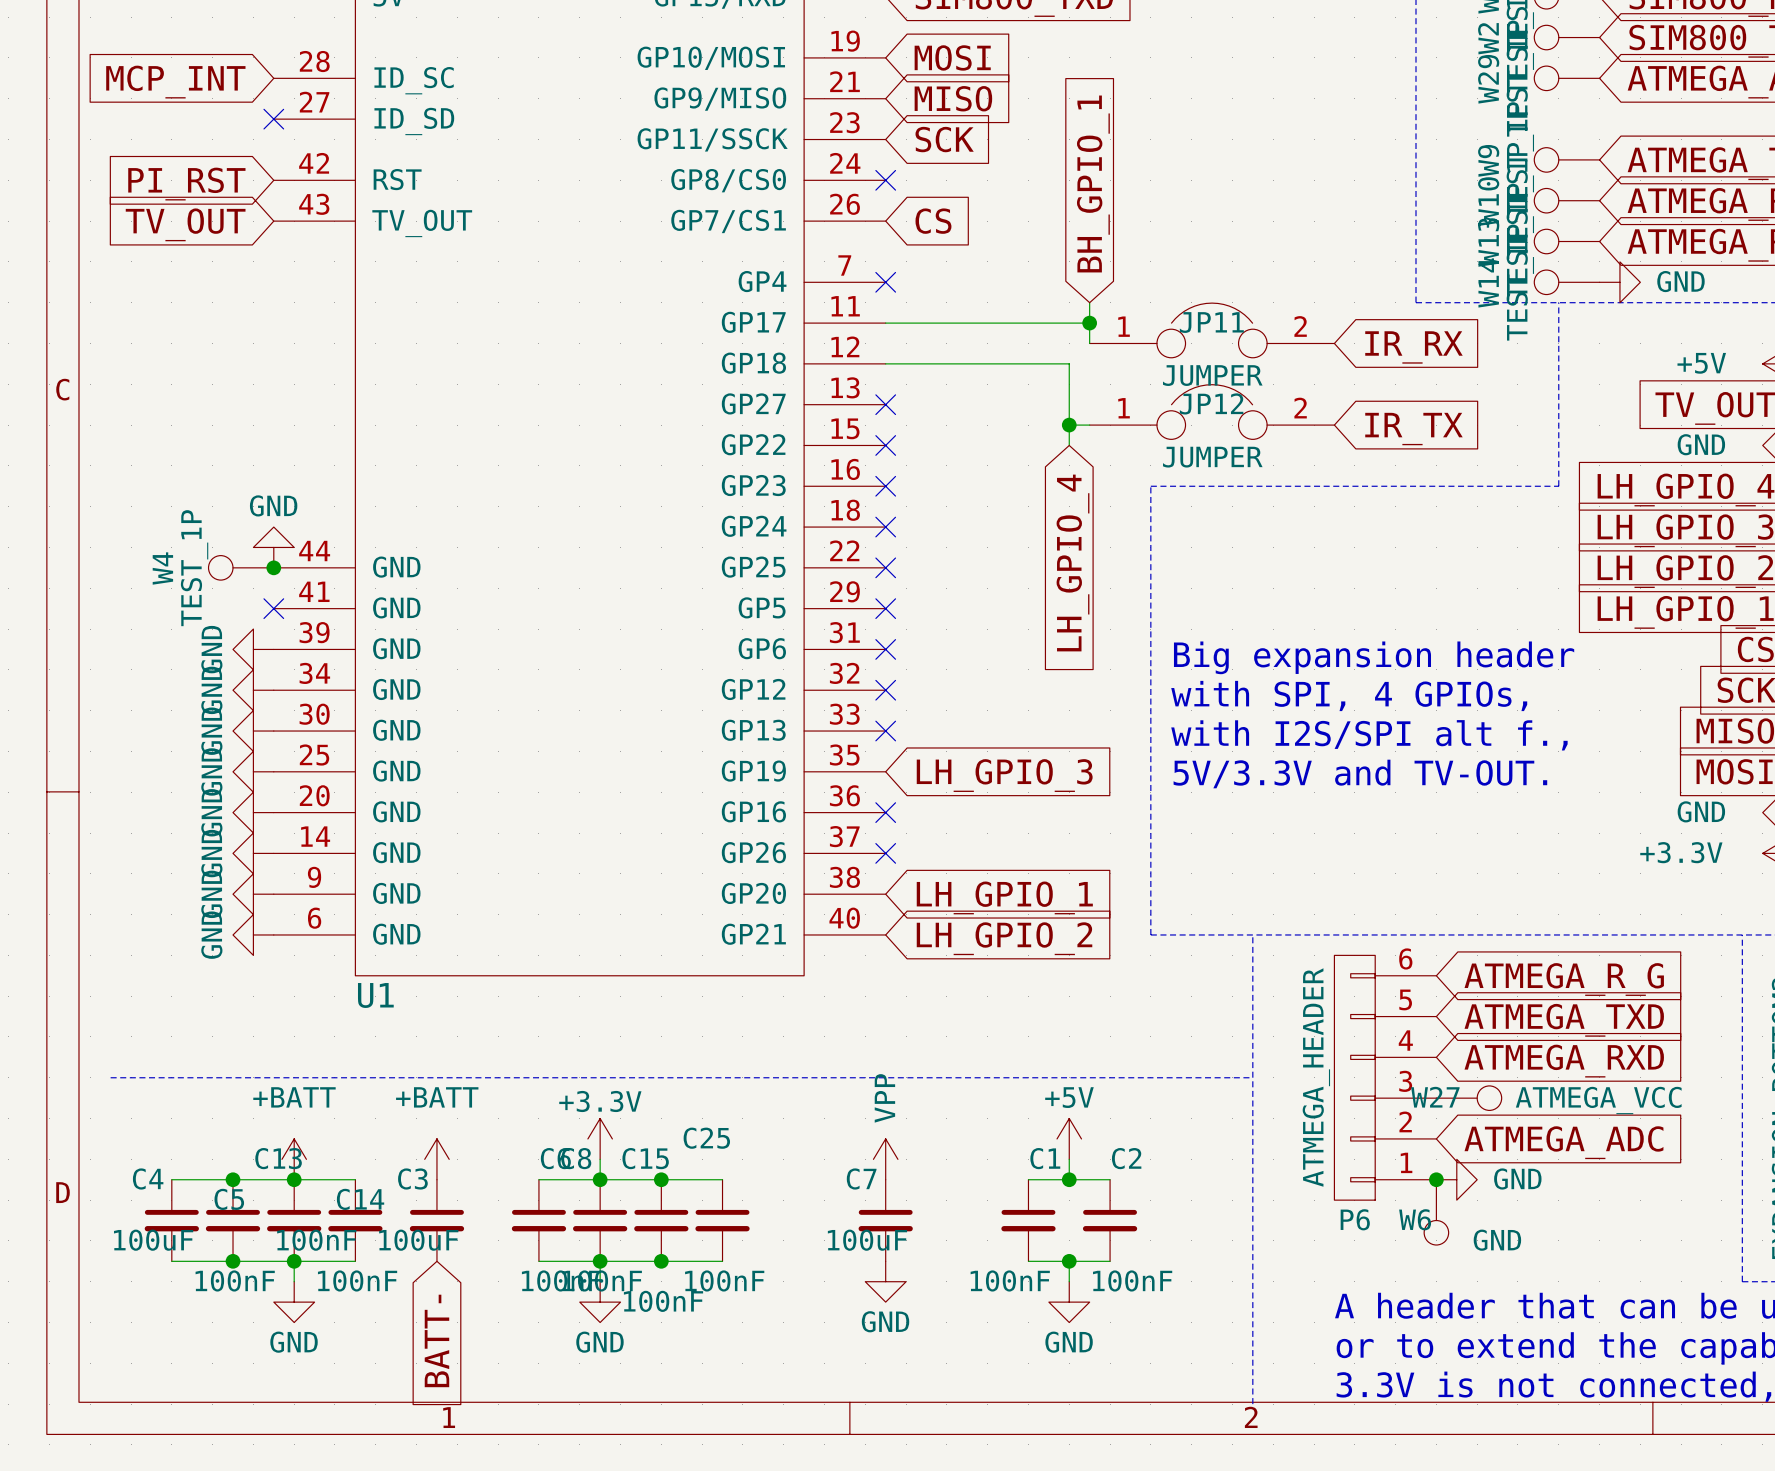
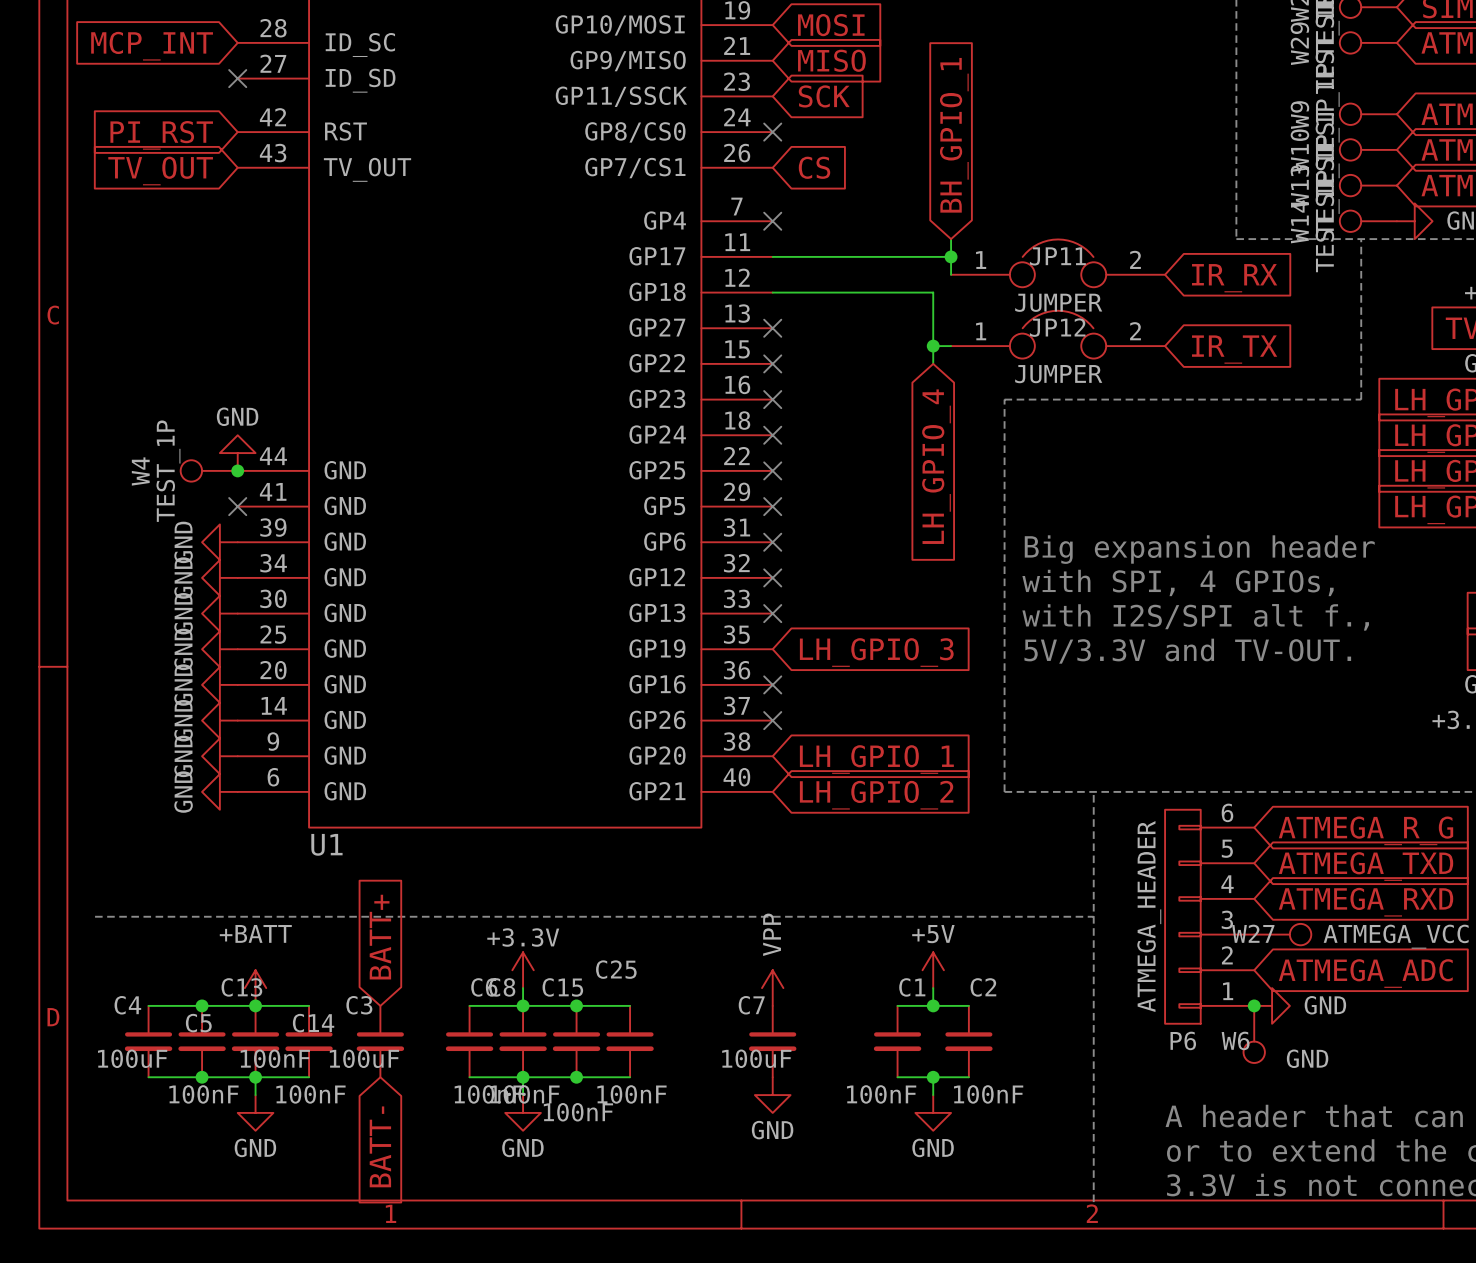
global label: none -> BATT+ (380, 937)
power symbol: +BATT (436, 1159) -> none

